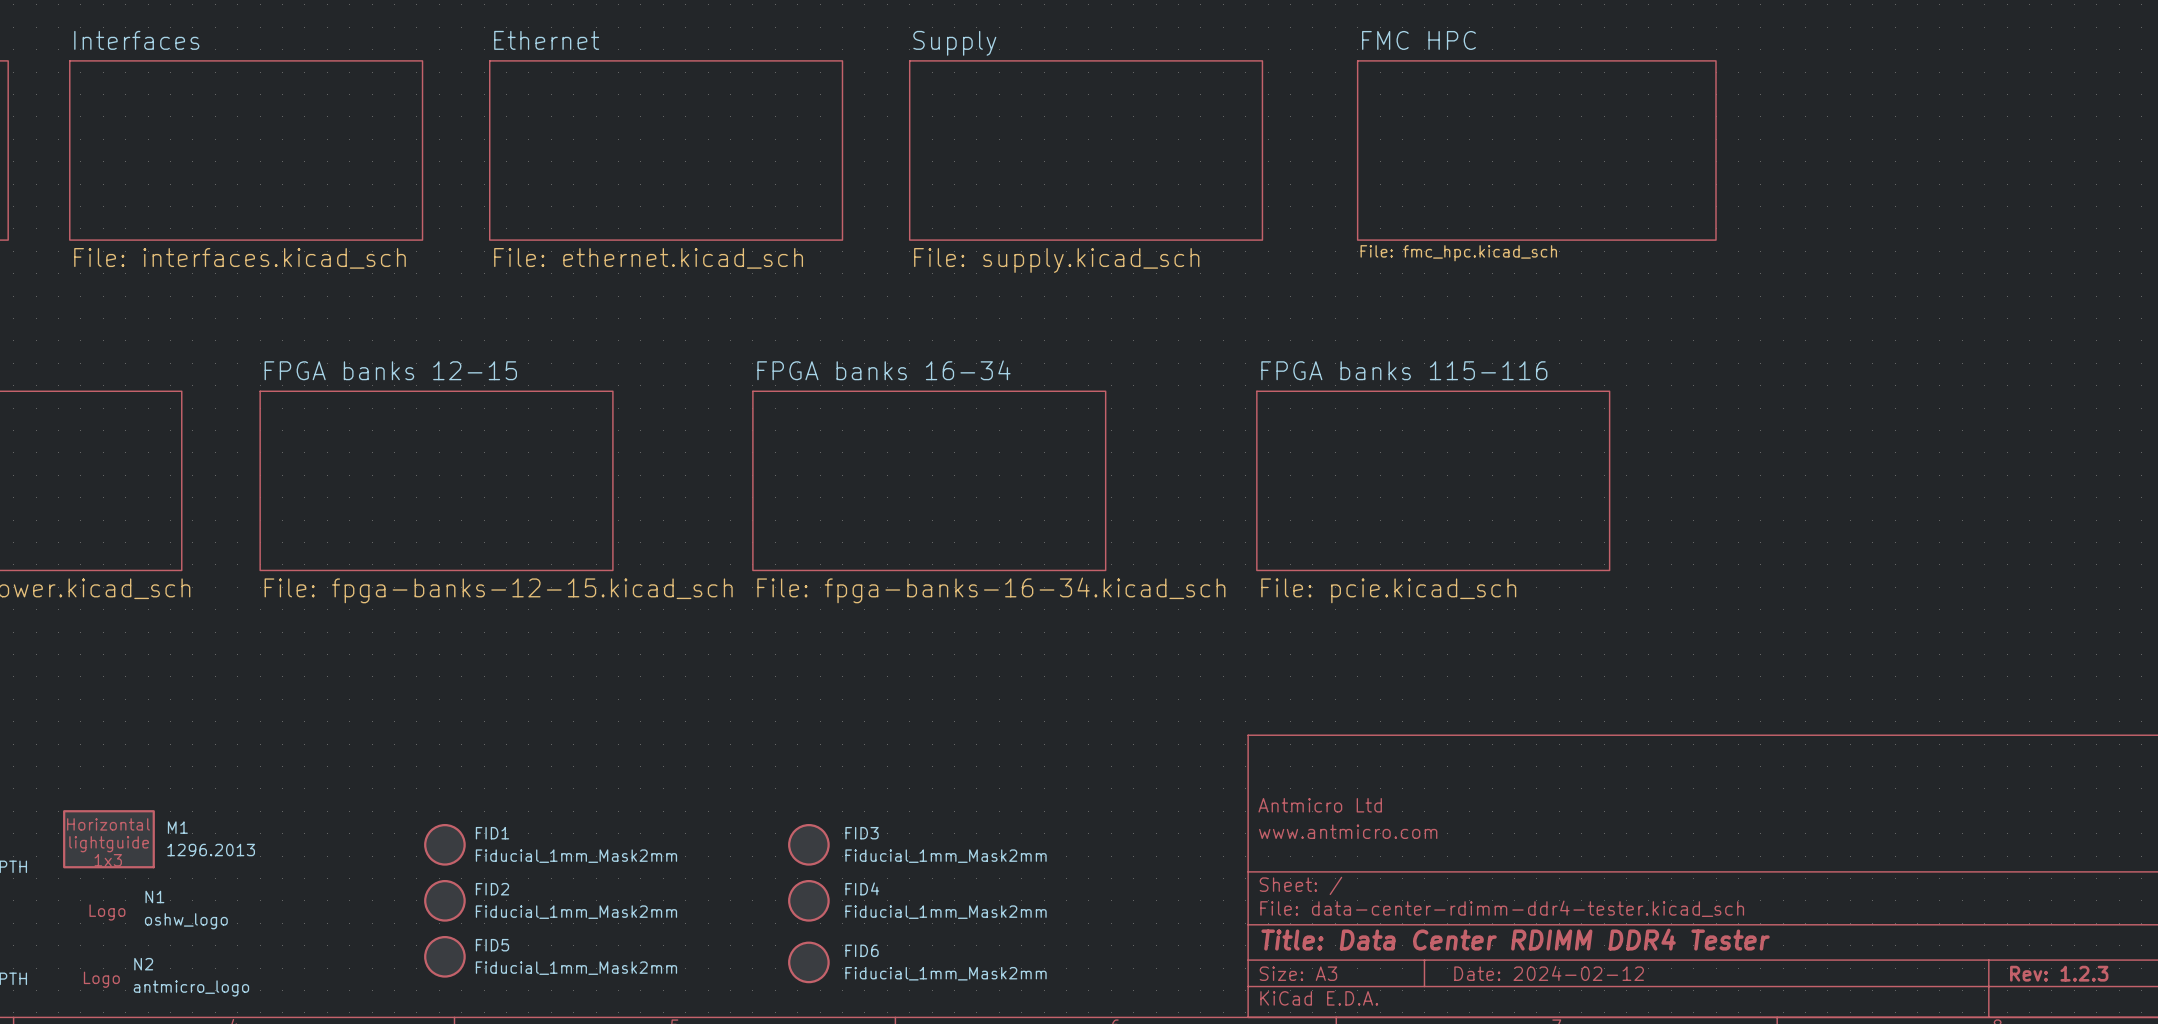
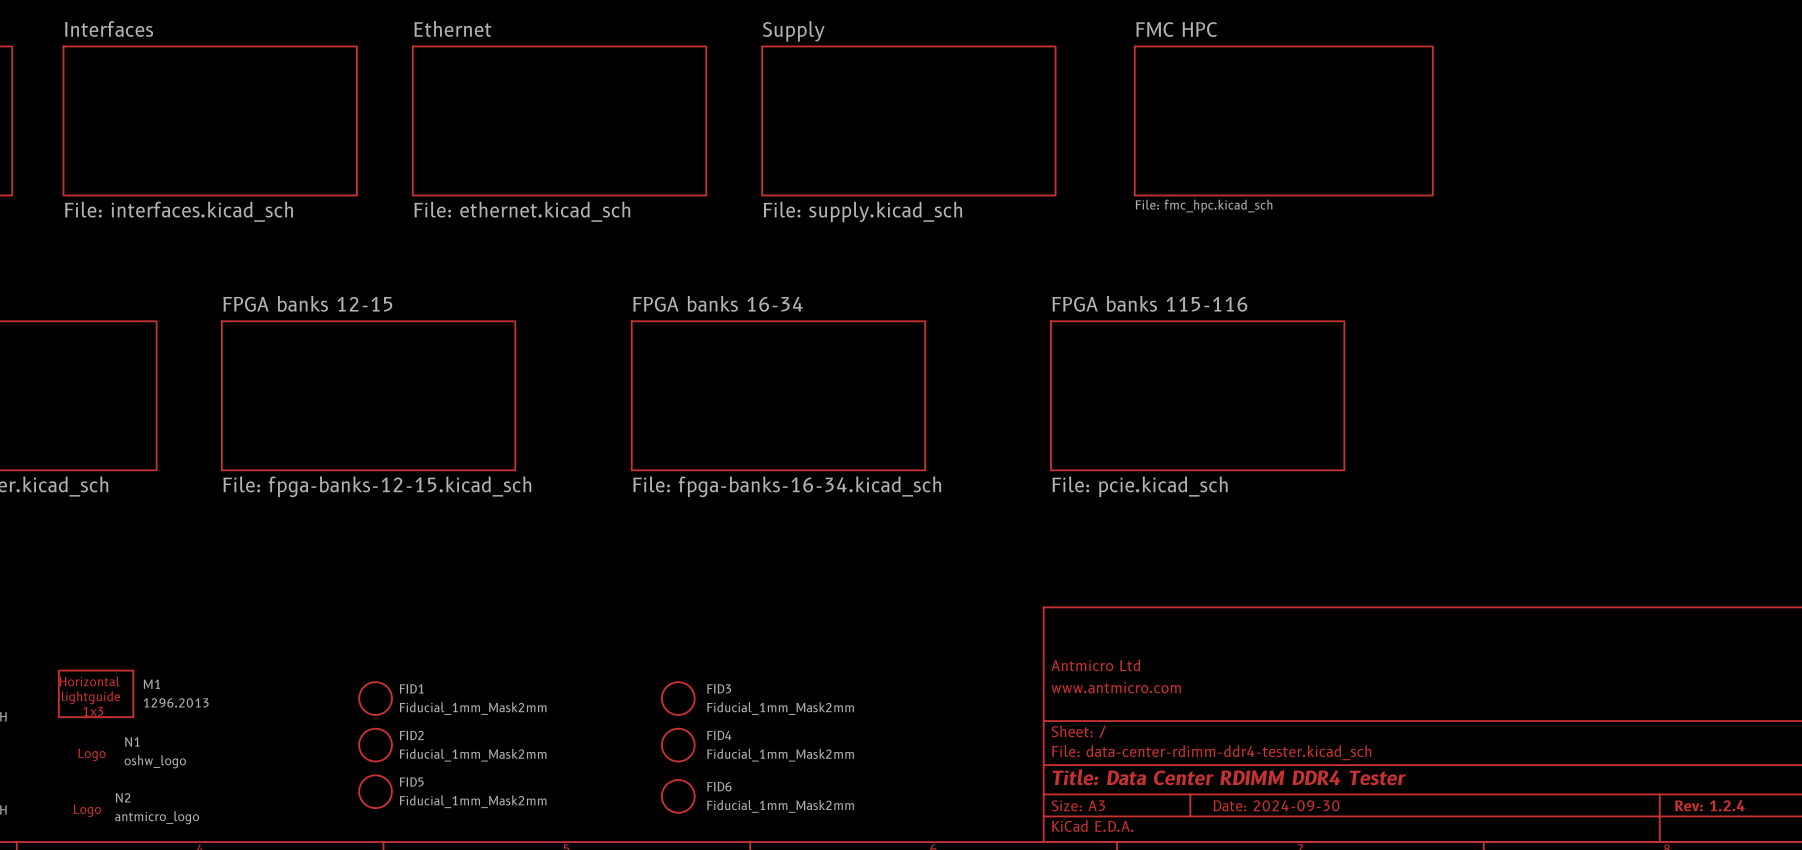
title block: Date: 2024-02-12 (1549, 973) -> Date: 2024-09-30 (1276, 805)
title block: Rev: 1.2.3 (2059, 973) -> Rev: 1.2.4 (1709, 805)

